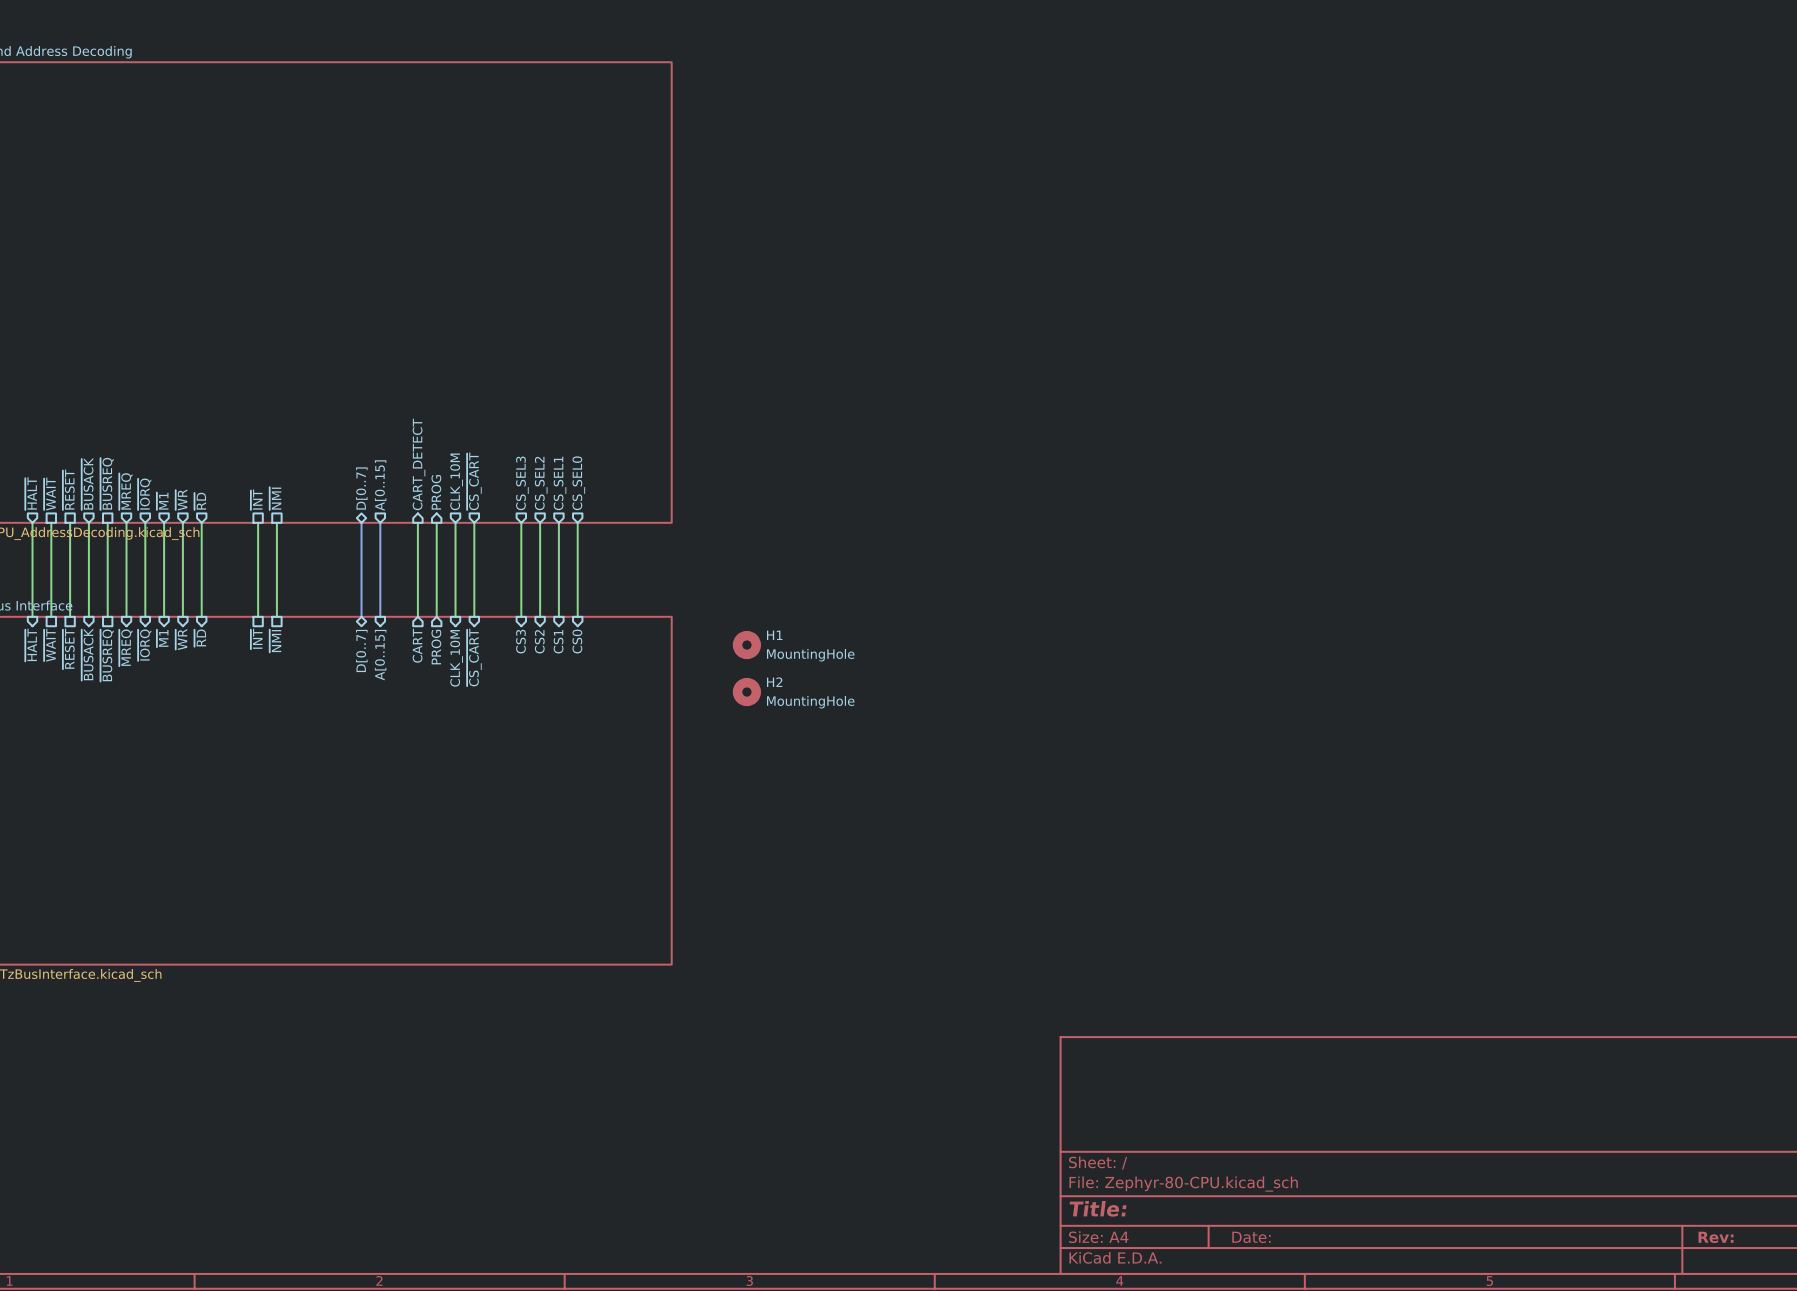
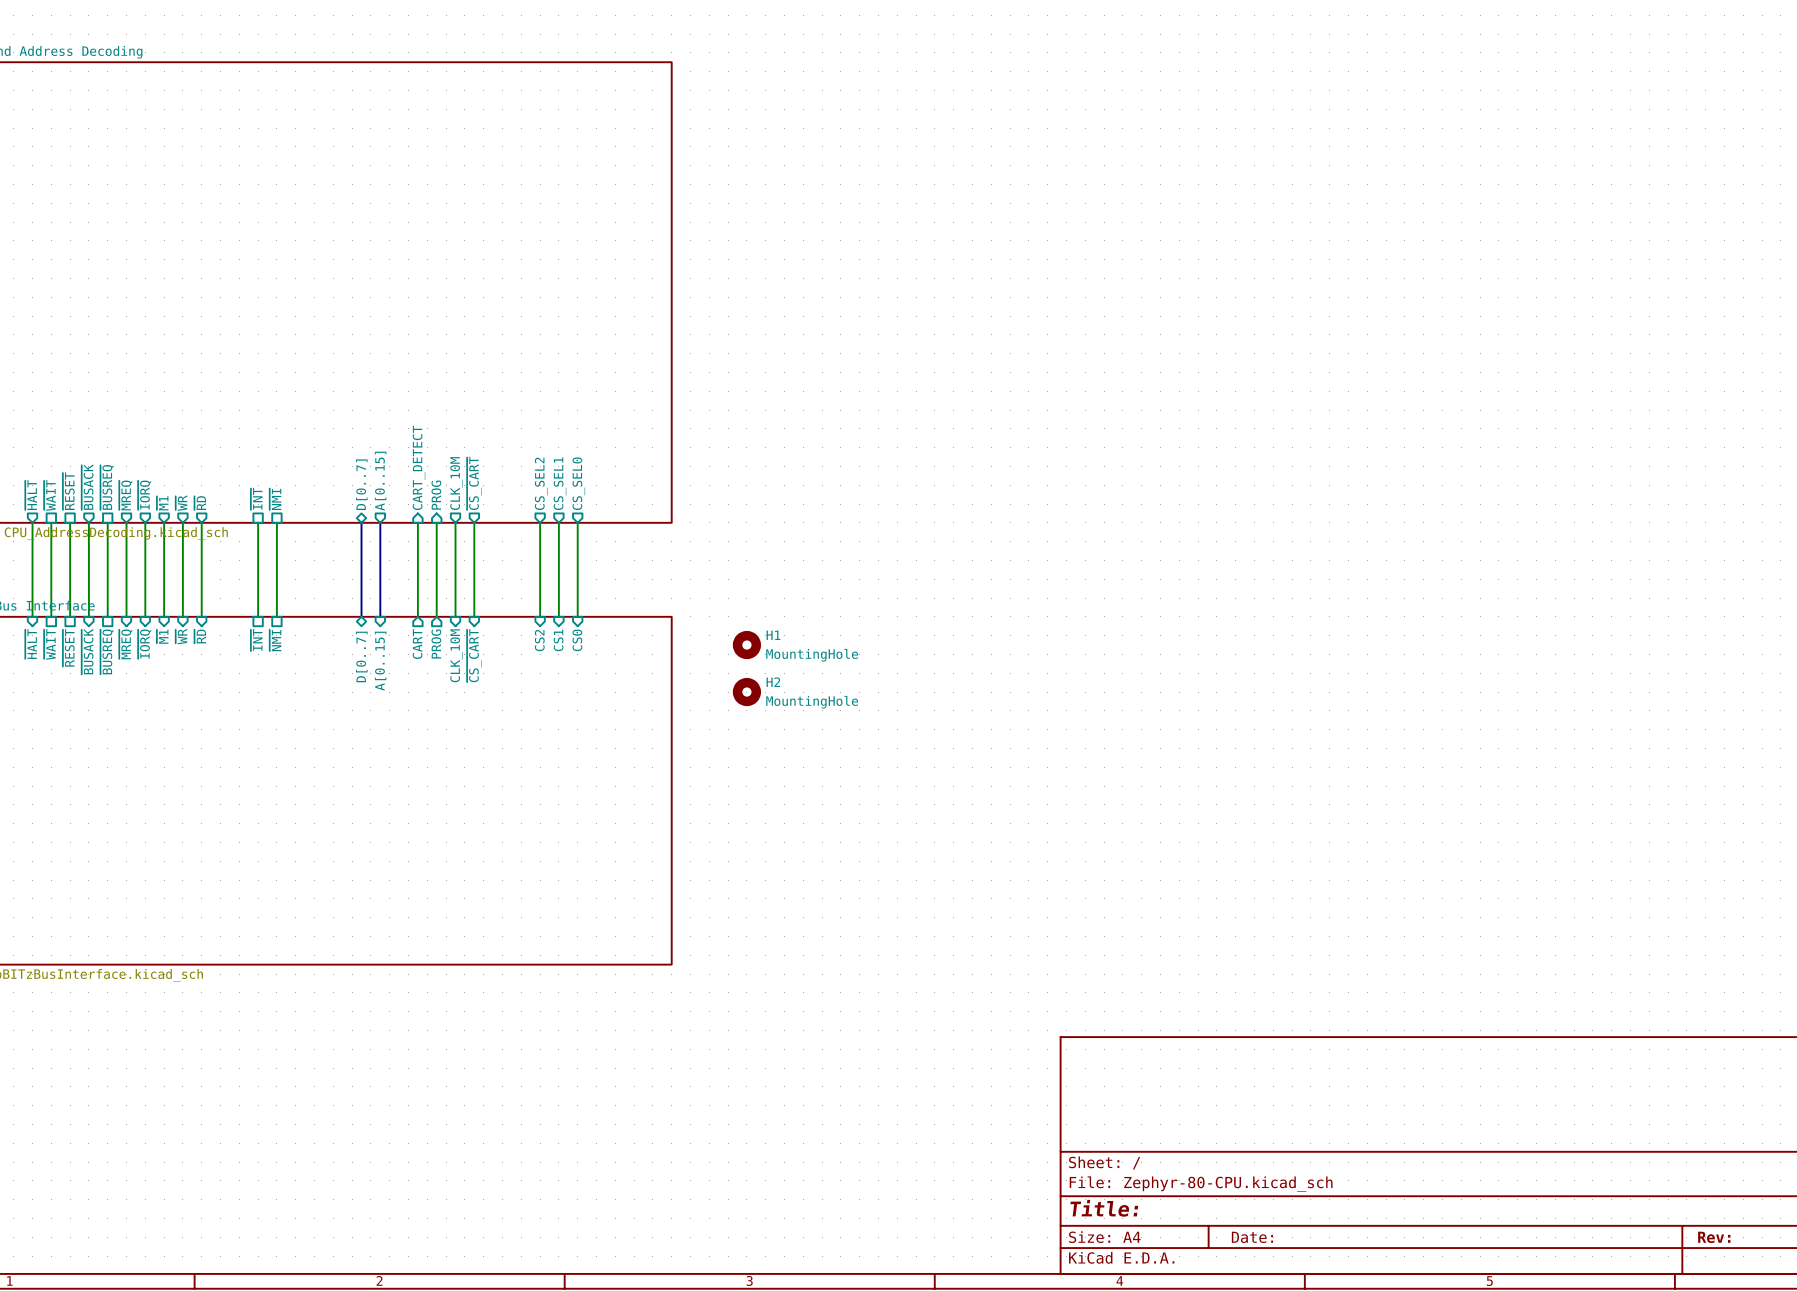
sheet pin: CS_SEL3 (522, 483) -> none
wire: (521, 522) (521, 616) -> none
sheet pin: CS3 (520, 641) -> none

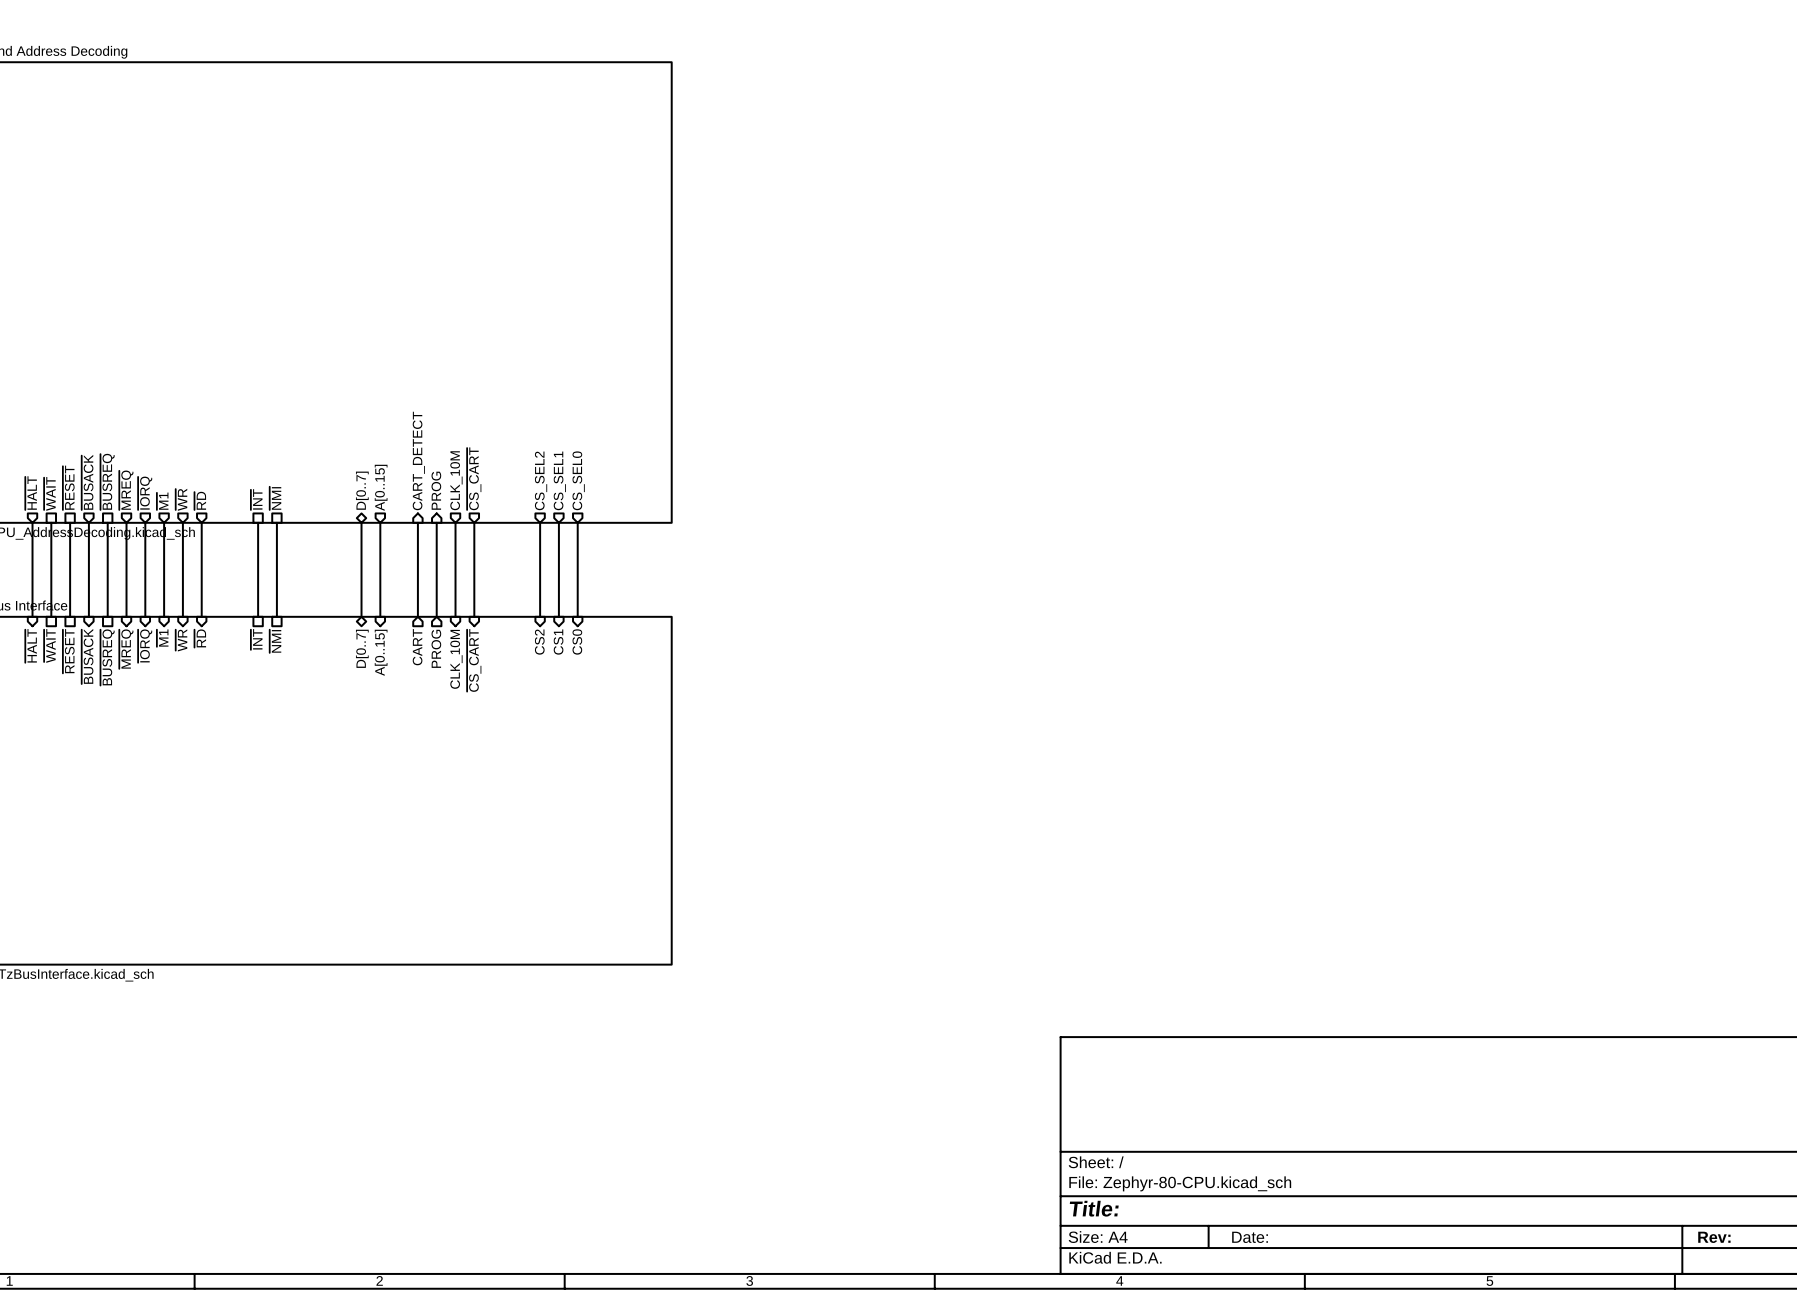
H1: MountingHole (746, 645) -> none
H2: MountingHole (746, 692) -> none

